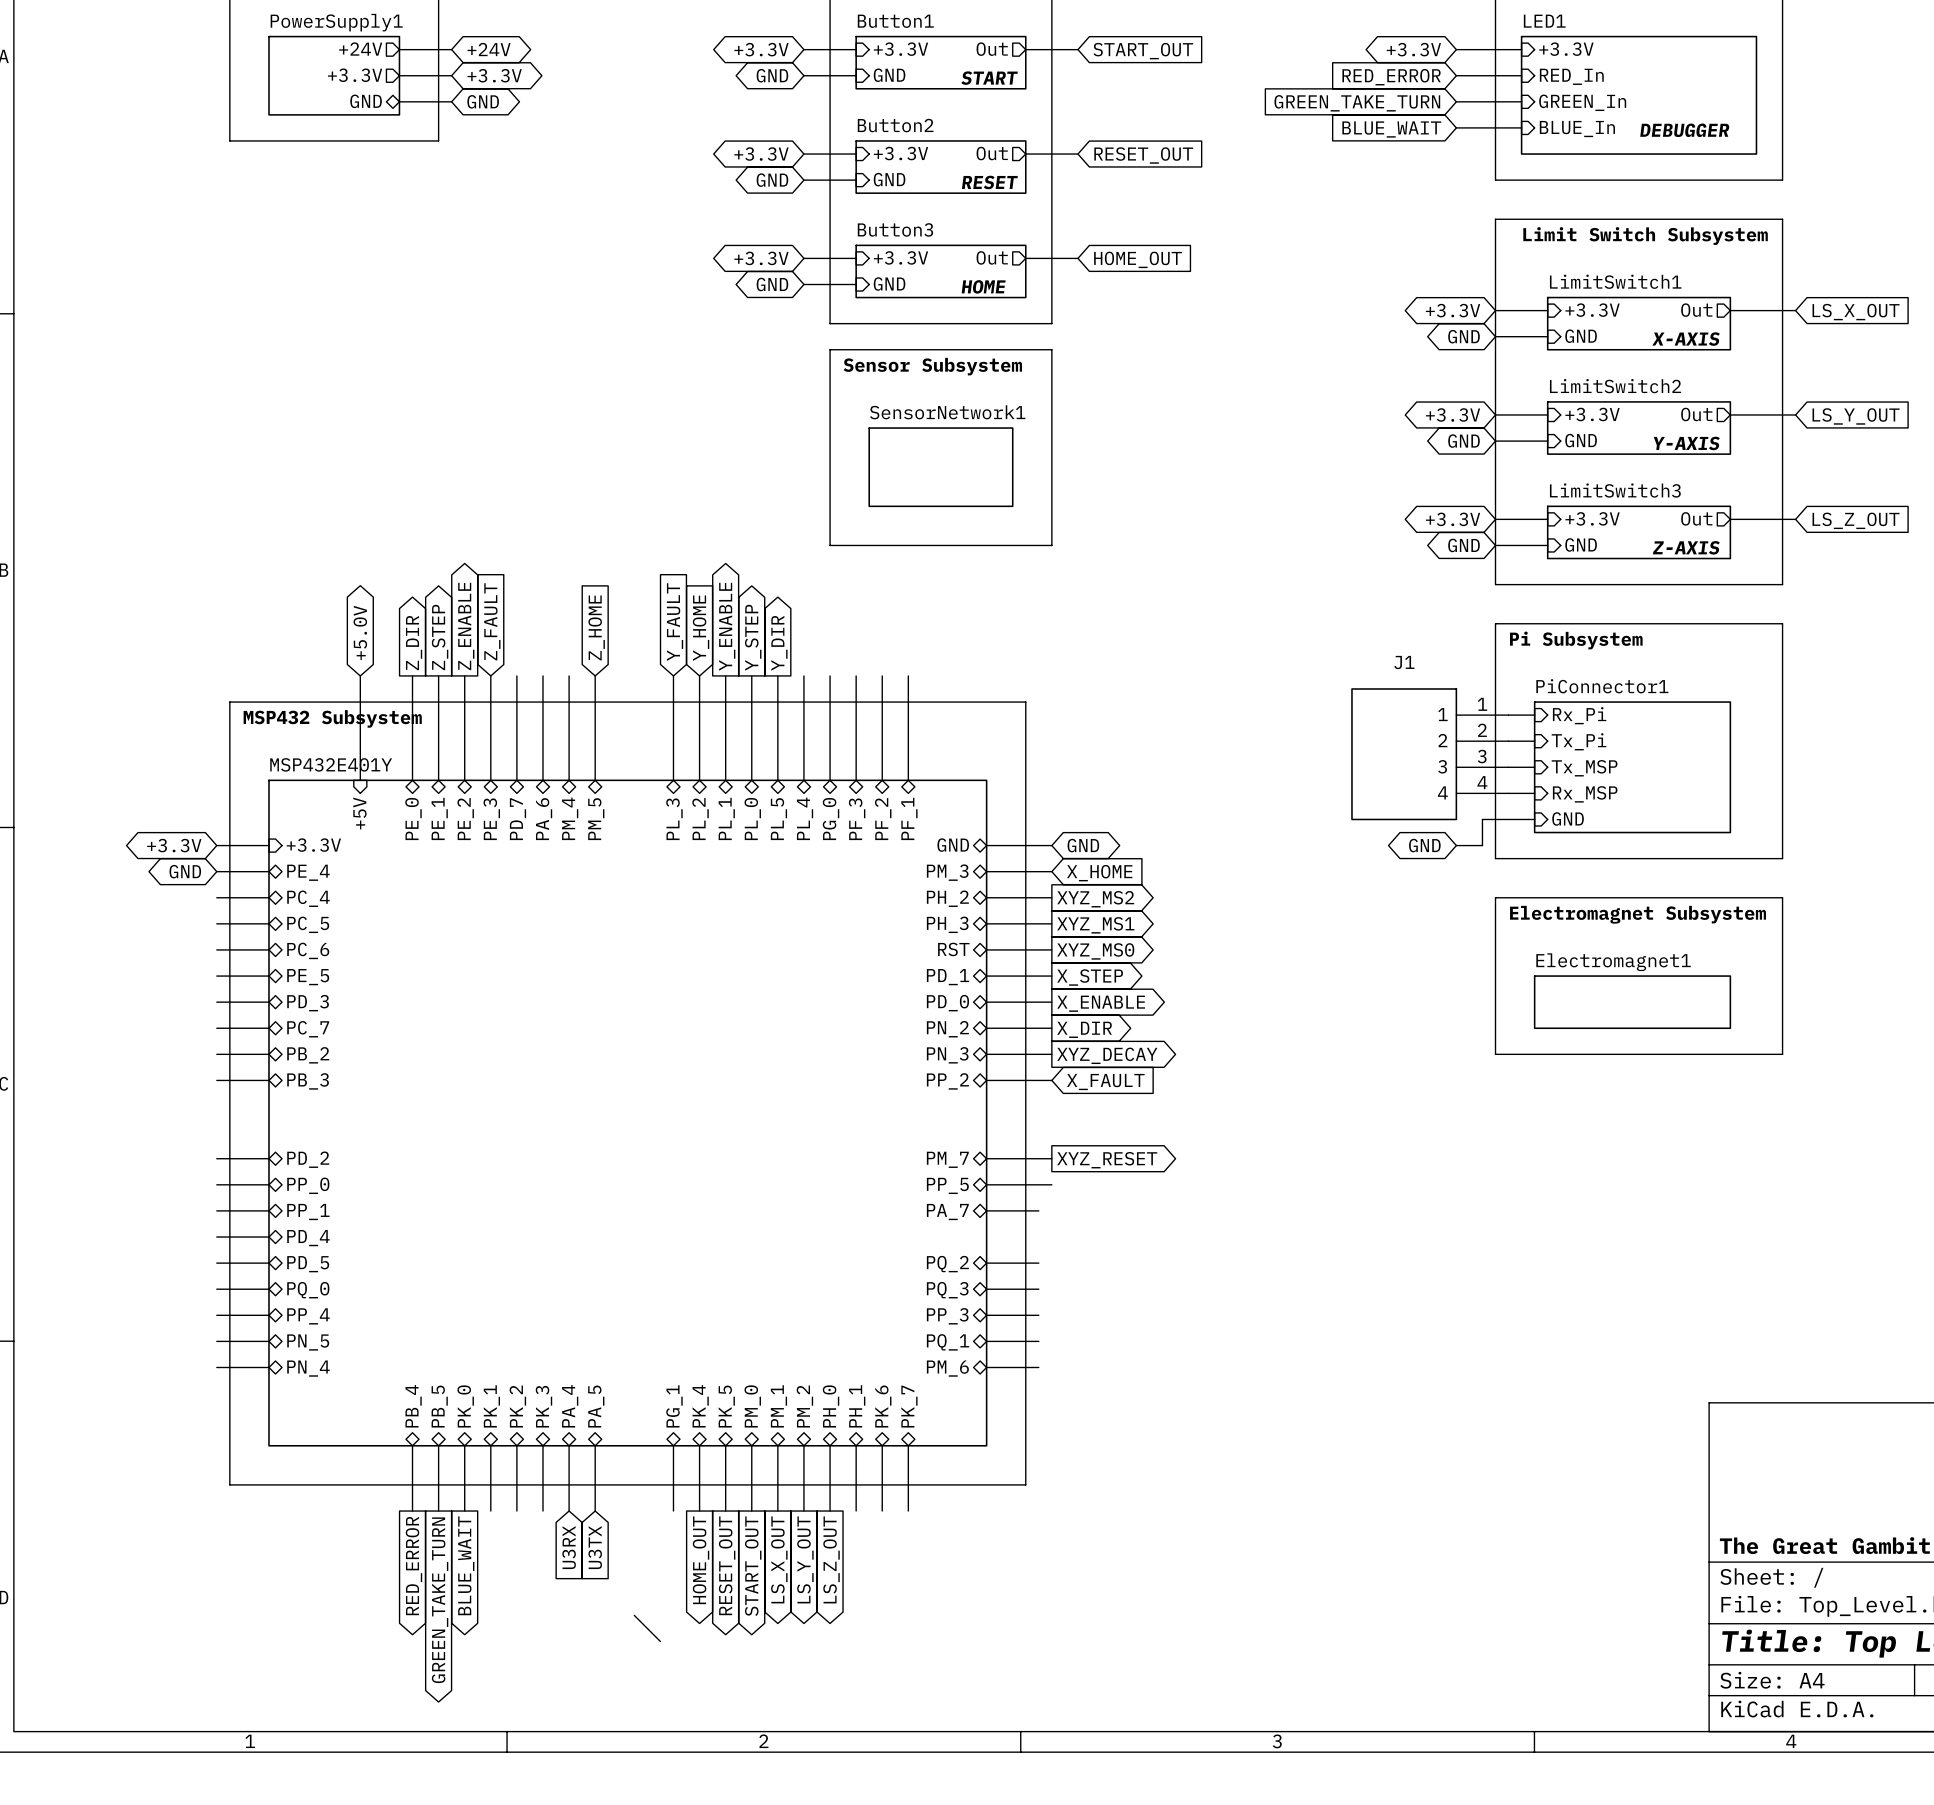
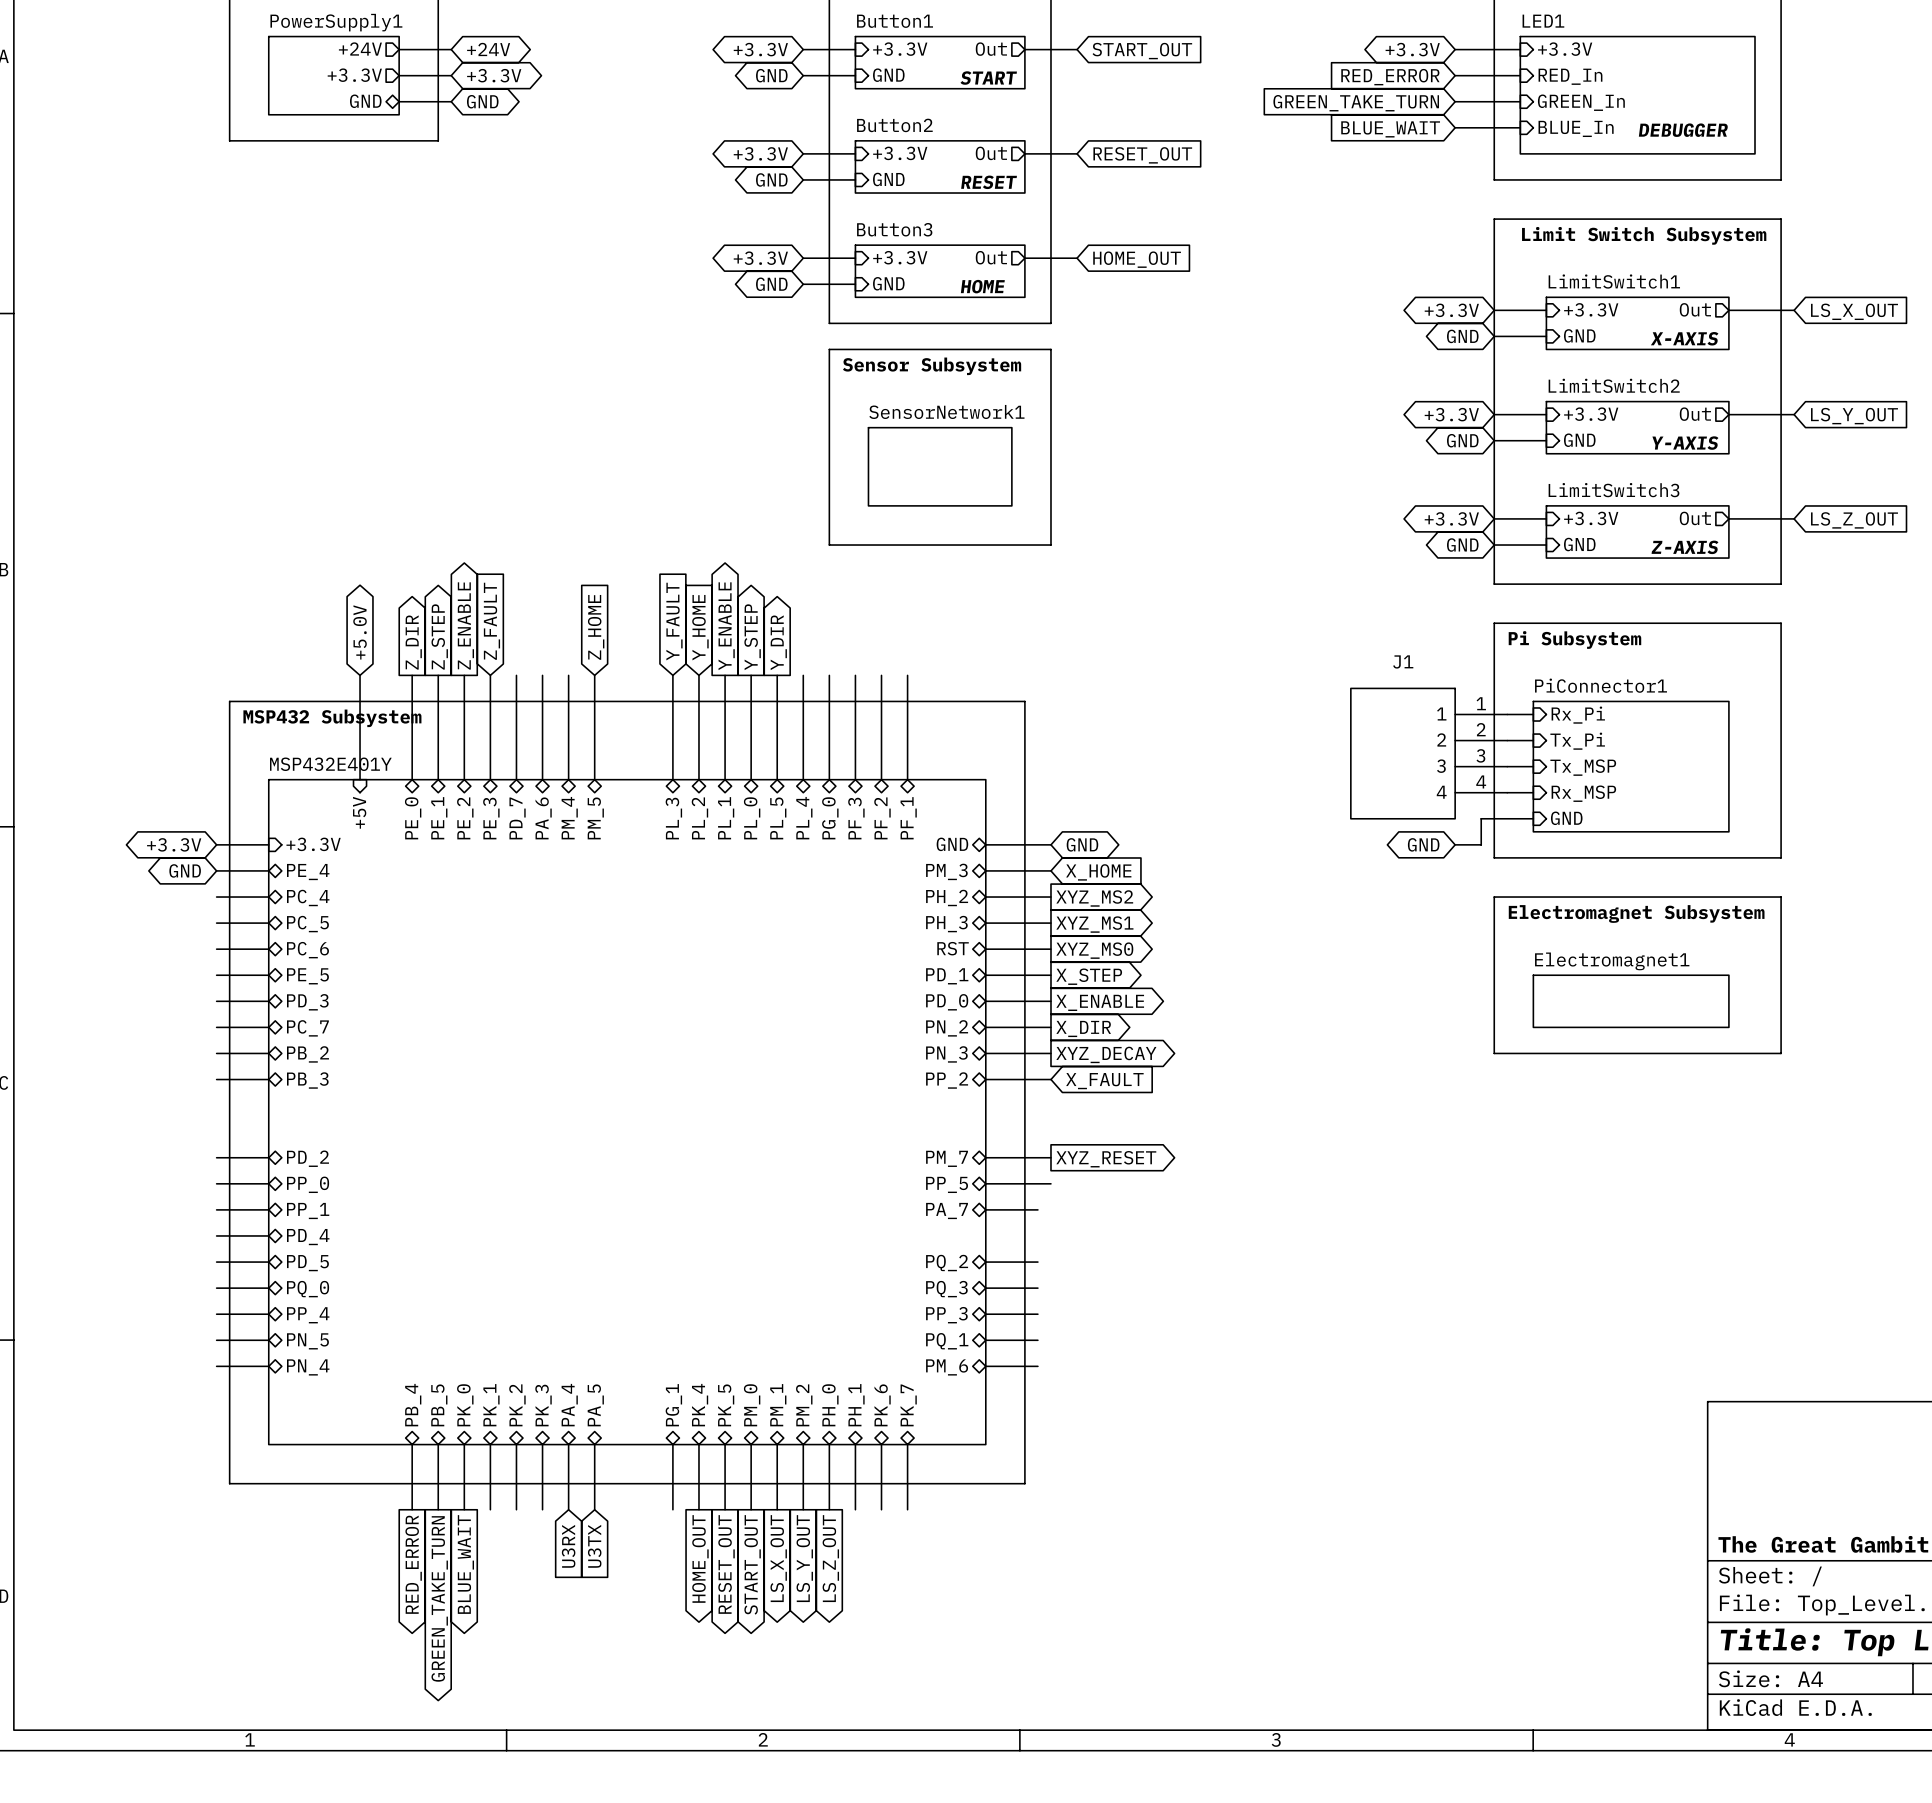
wire: (634, 1615) (660, 1641) -> none

